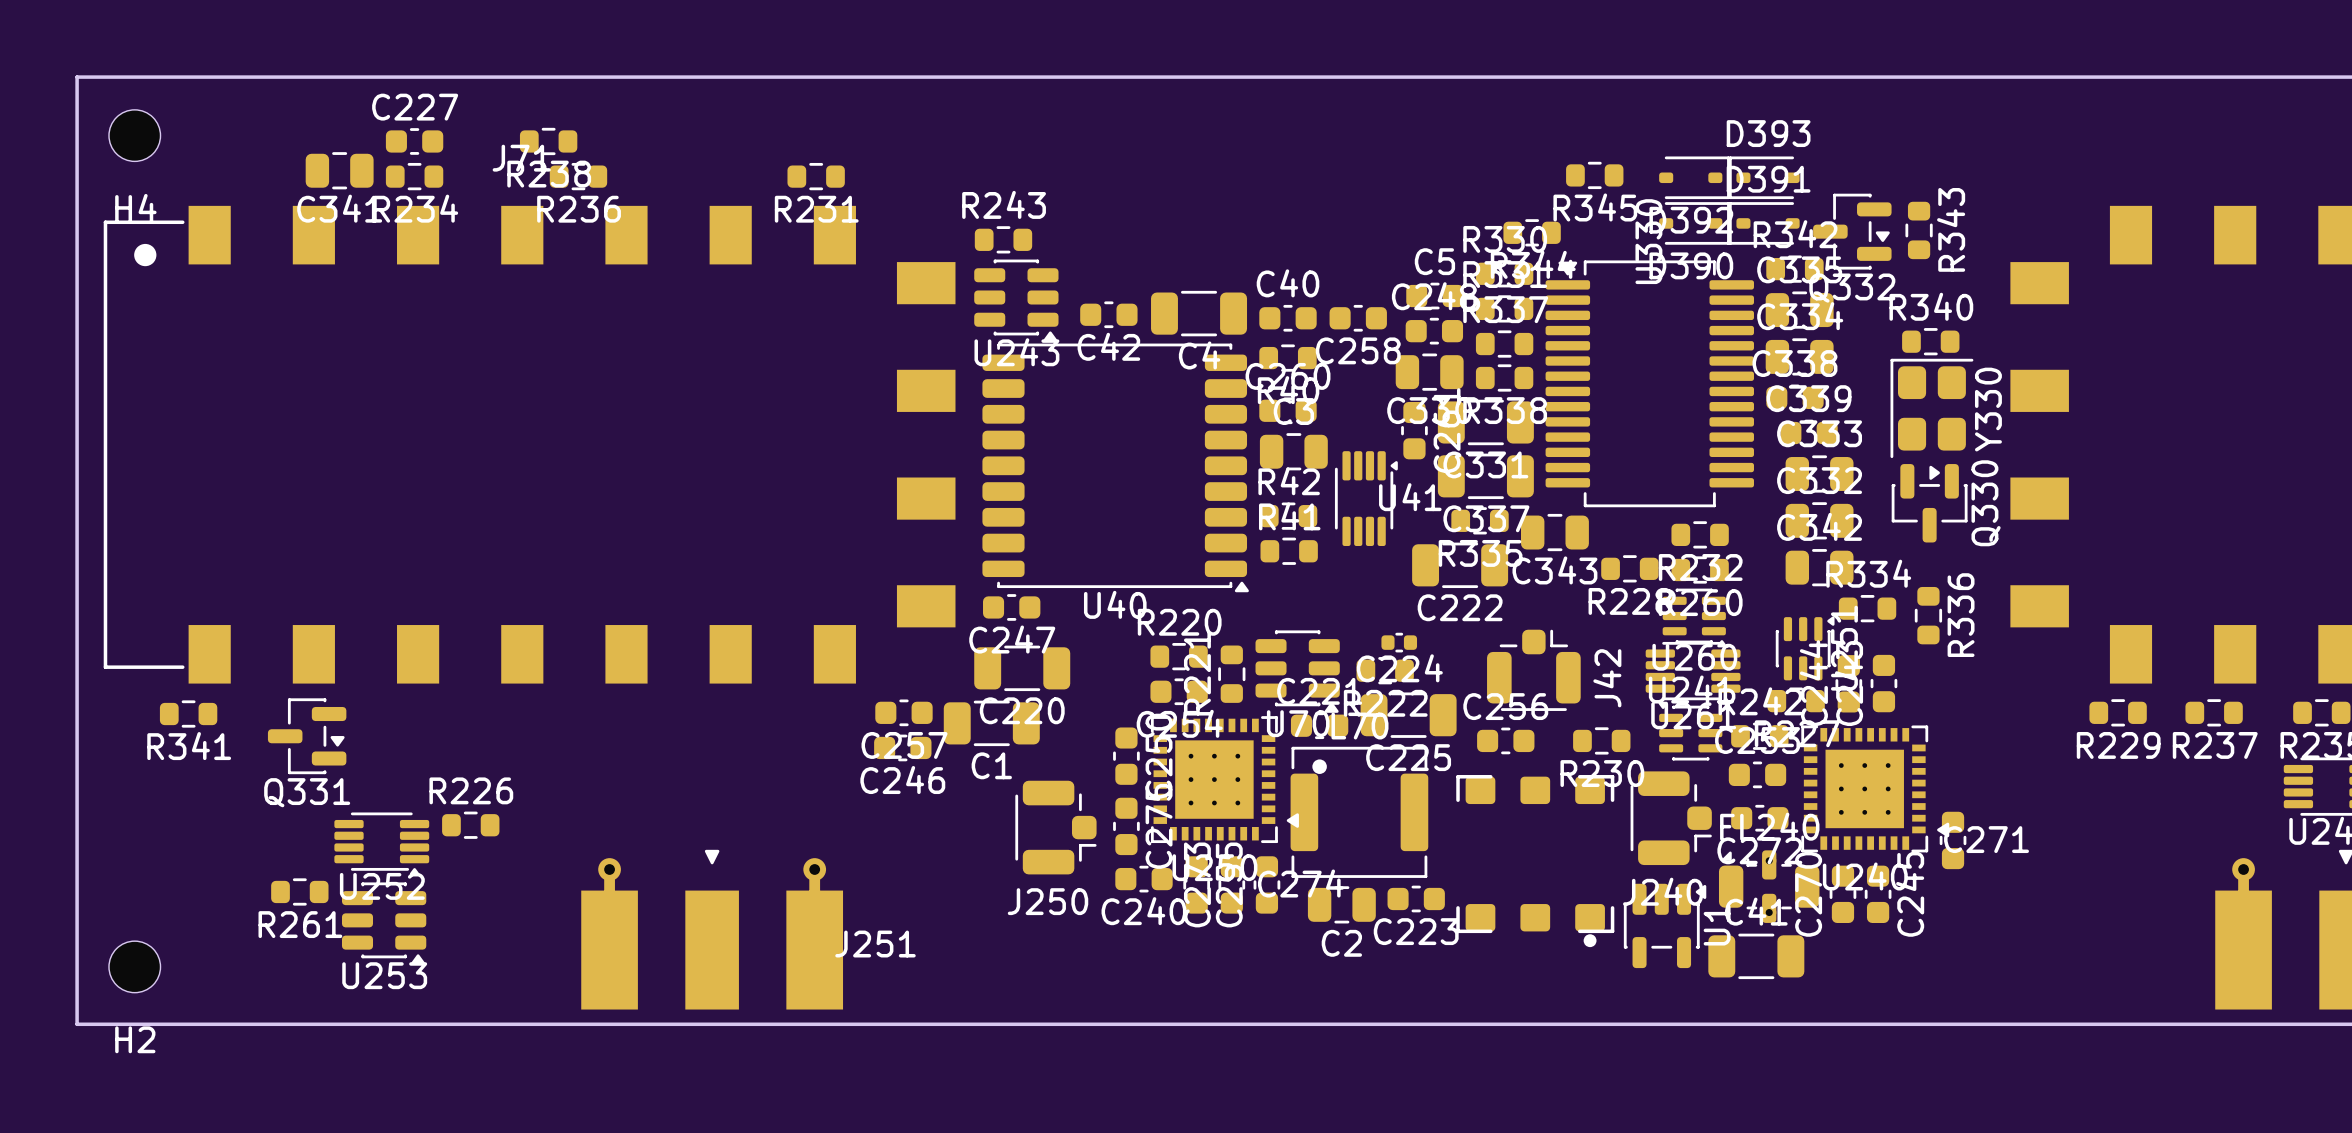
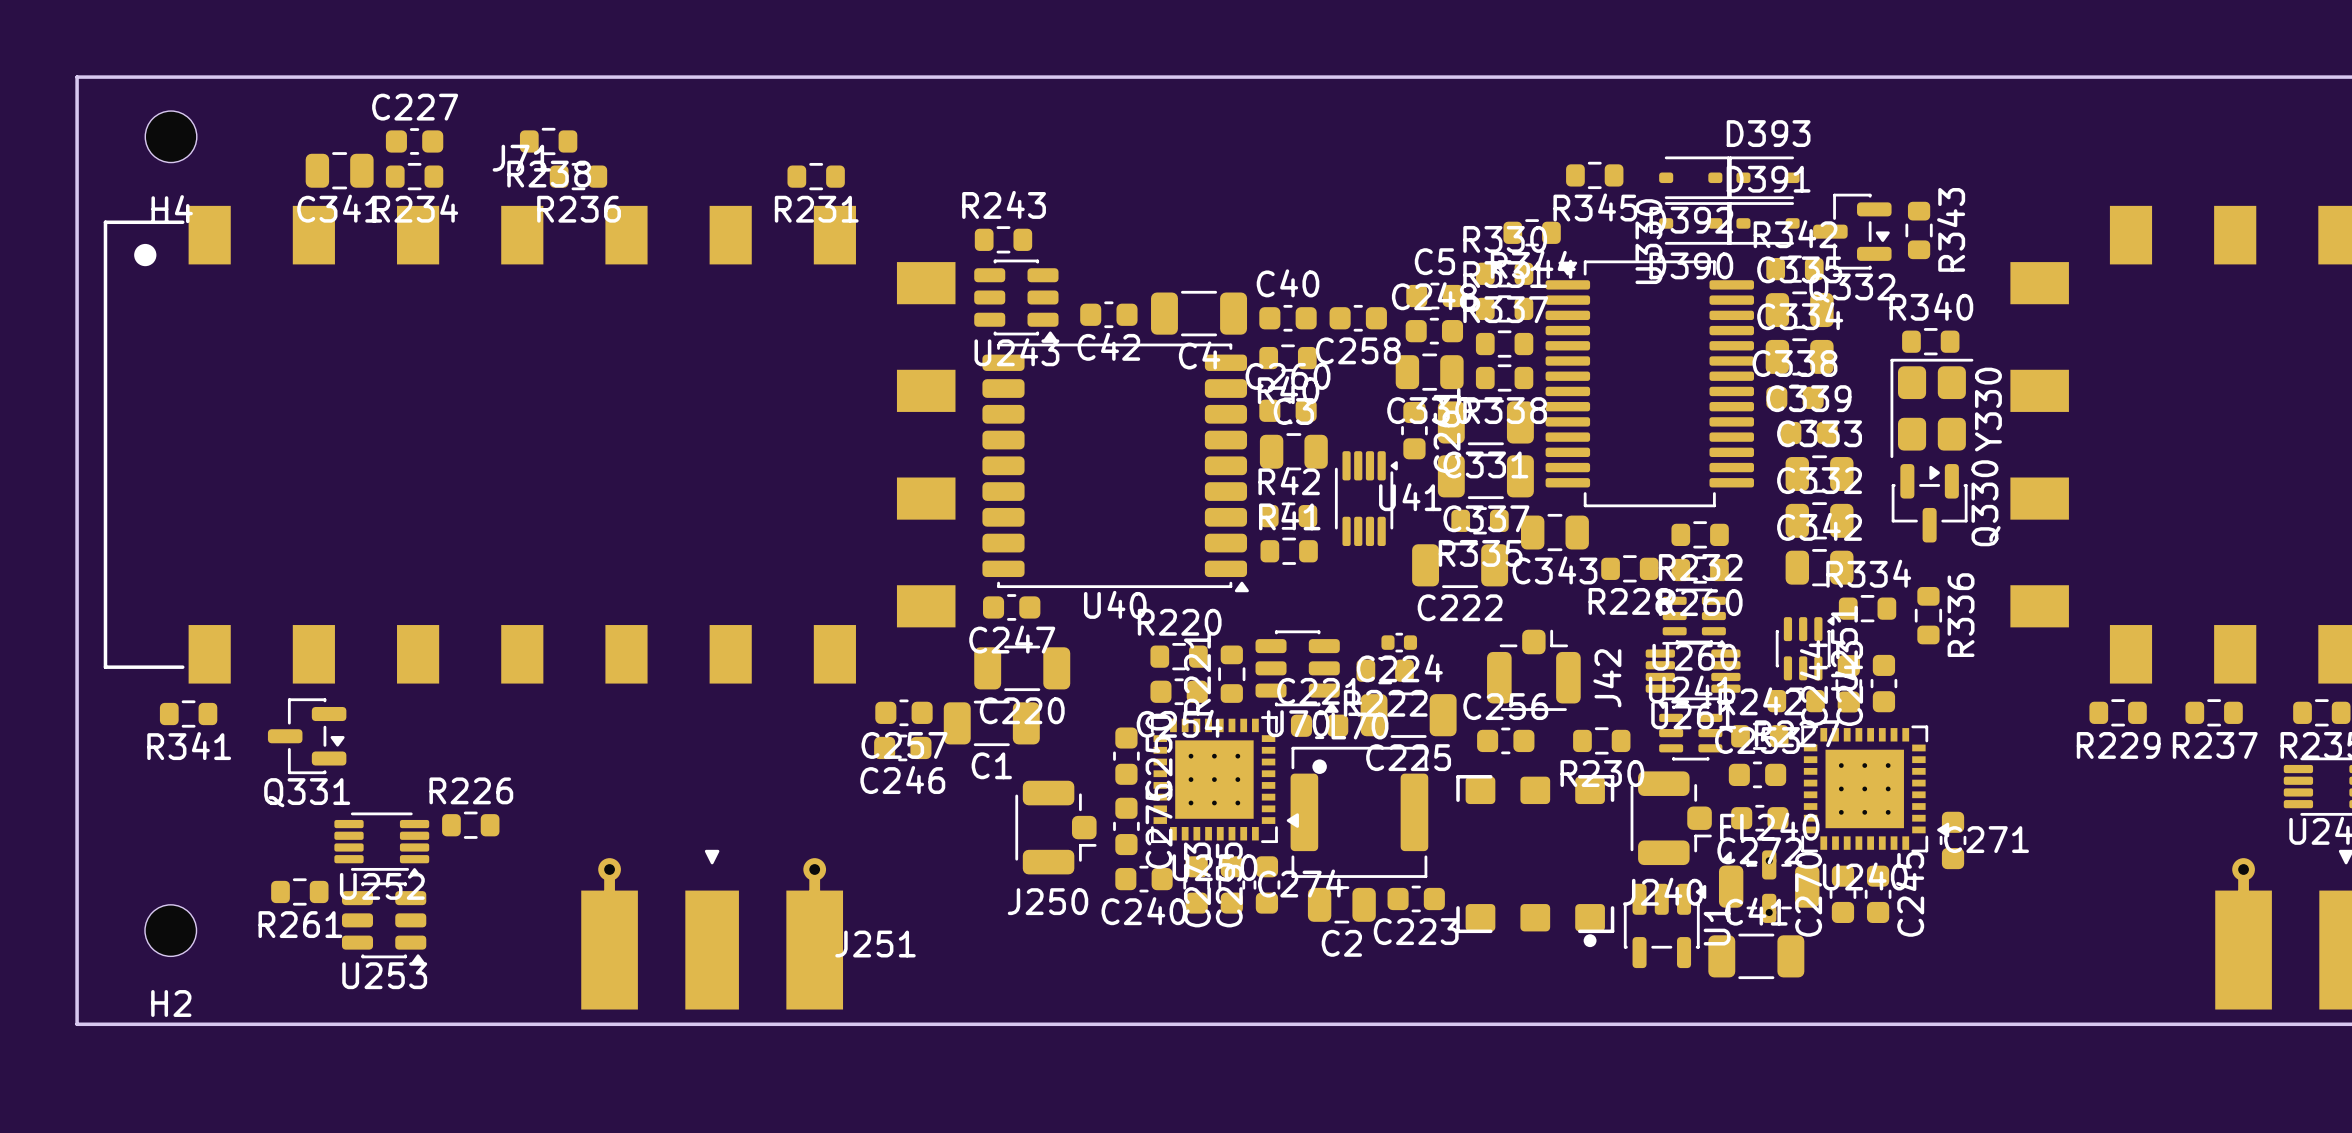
H4 position: (134, 135) -> (171, 136)
H2 position: (134, 966) -> (170, 930)

